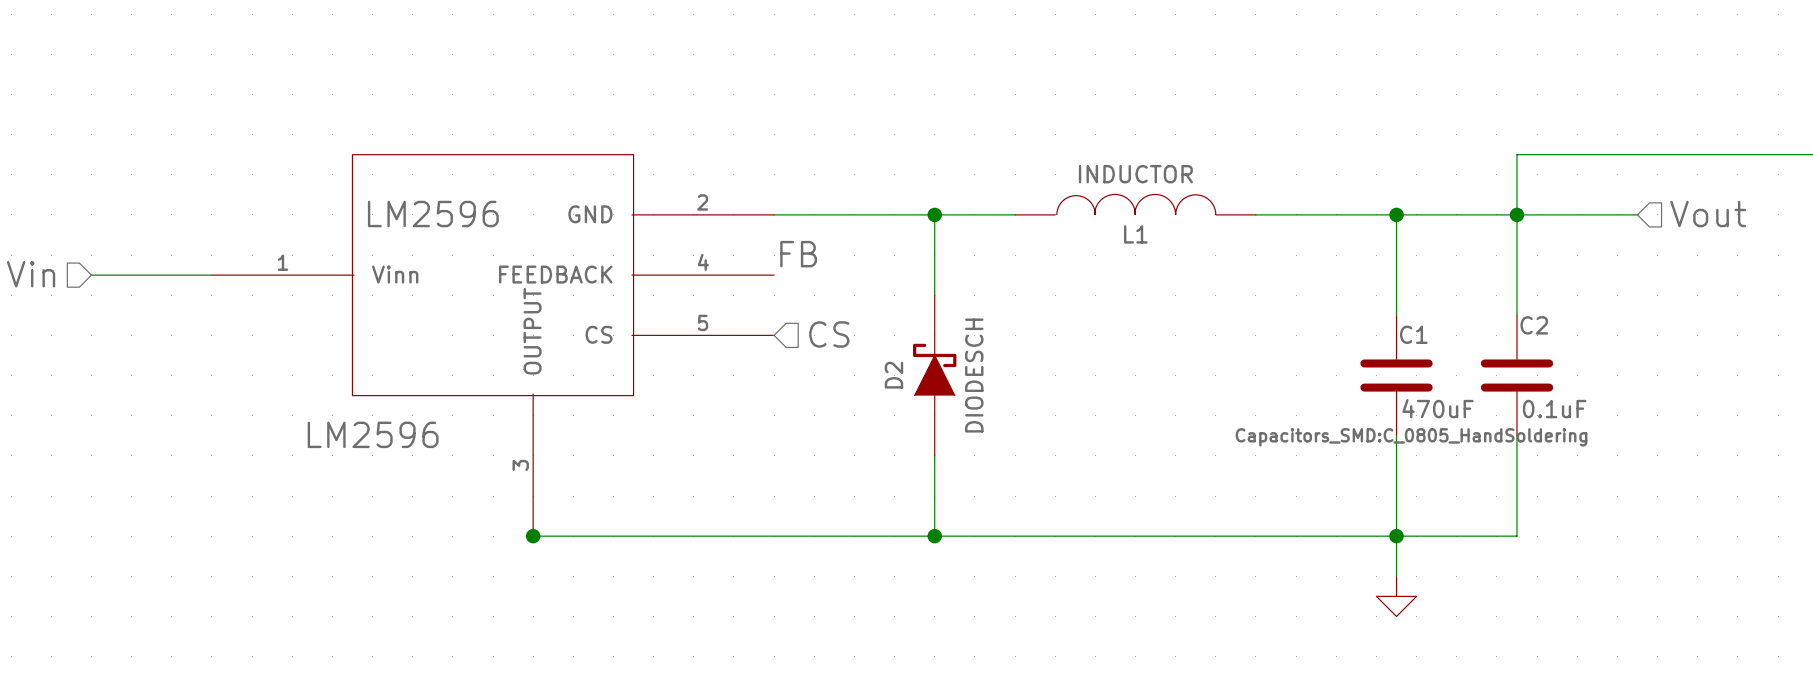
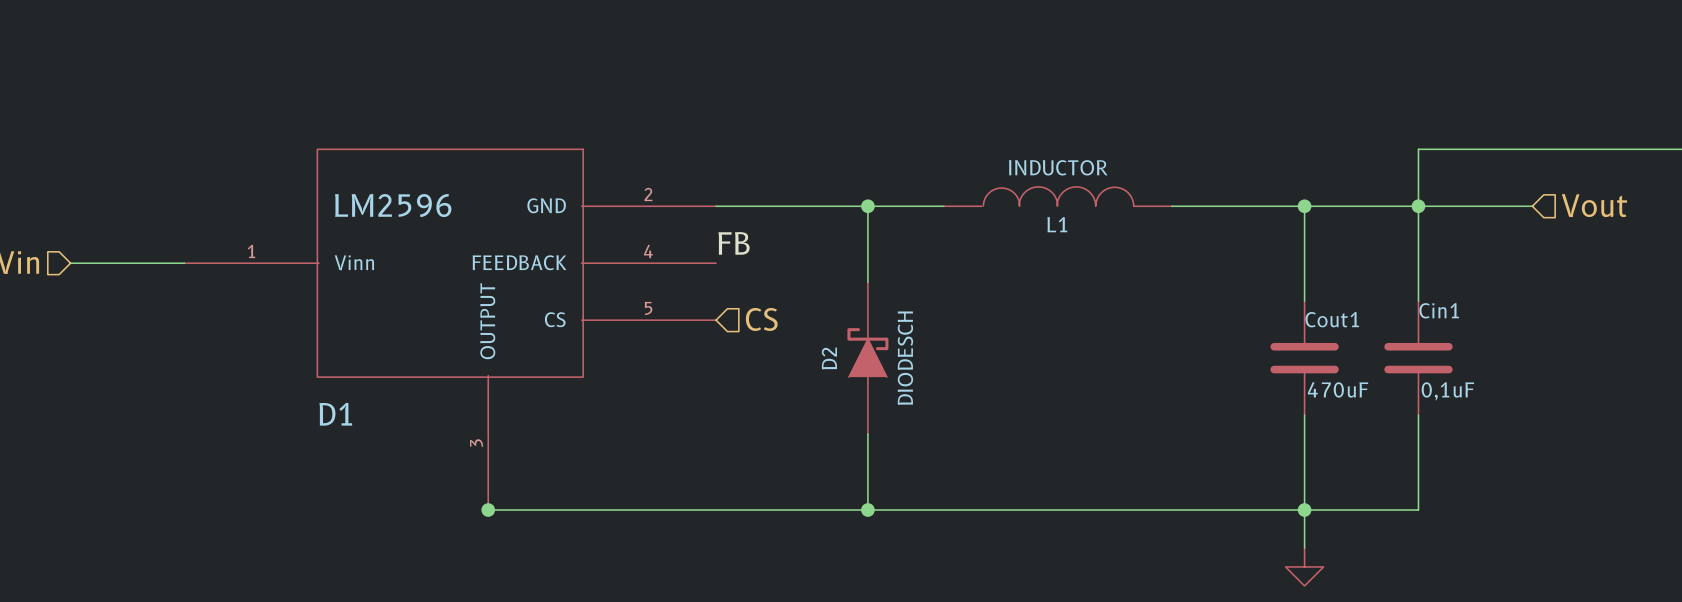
C2 name: C2 (1534, 325) -> Cin1 (1439, 310)
C1 name: C1 (1413, 334) -> Cout1 (1332, 319)
C2 value: 0.1uF (1554, 409) -> 0,1uF (1447, 391)
LM2596 name: LM2596 (373, 434) -> D1 (335, 414)
C1 text: Capacitors_SMD:C_0805_HandSoldering (1411, 437) -> none

